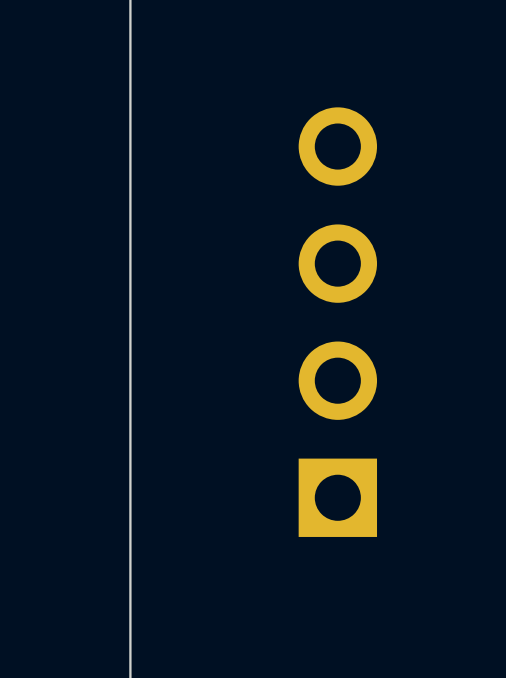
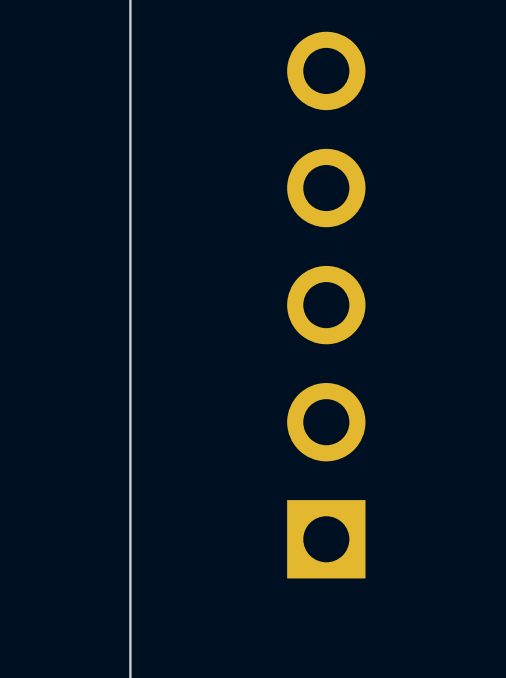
part footprint: [298, 107, 378, 537] -> [287, 31, 366, 579]

